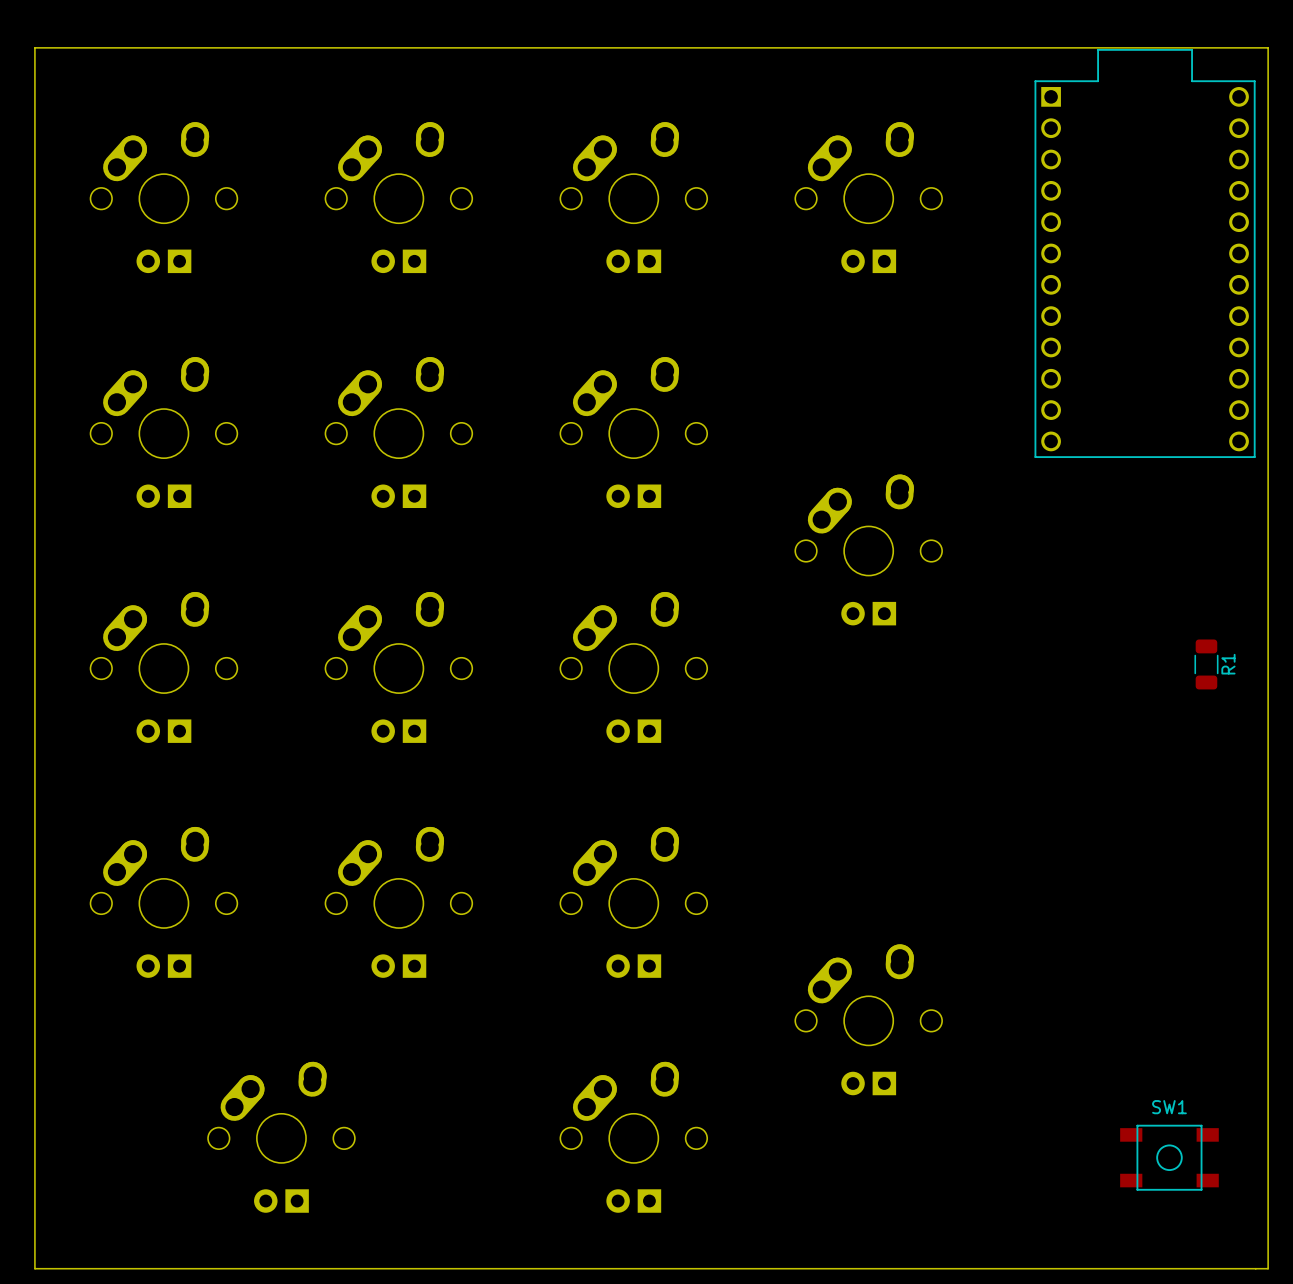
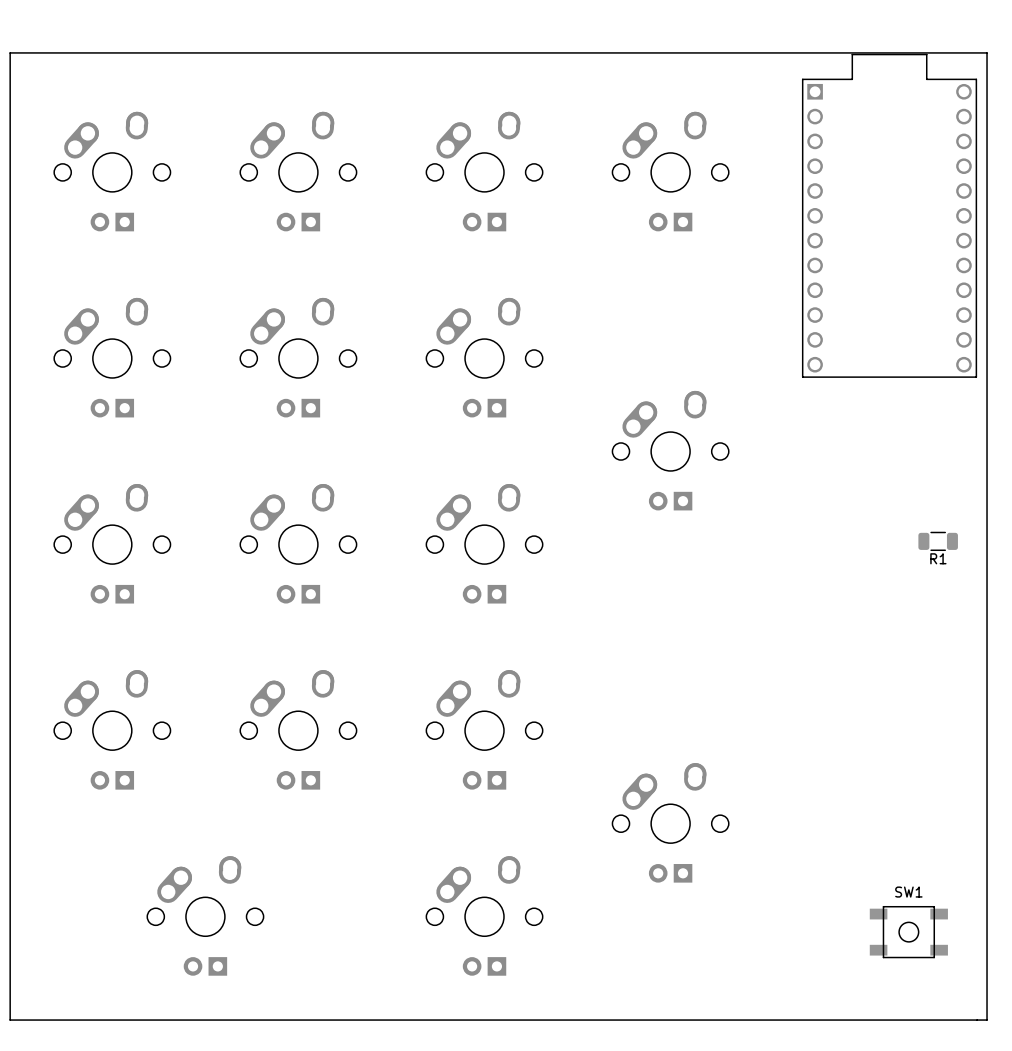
R1 rotation: 0° (1206, 664) -> 90° clockwise (938, 541)

